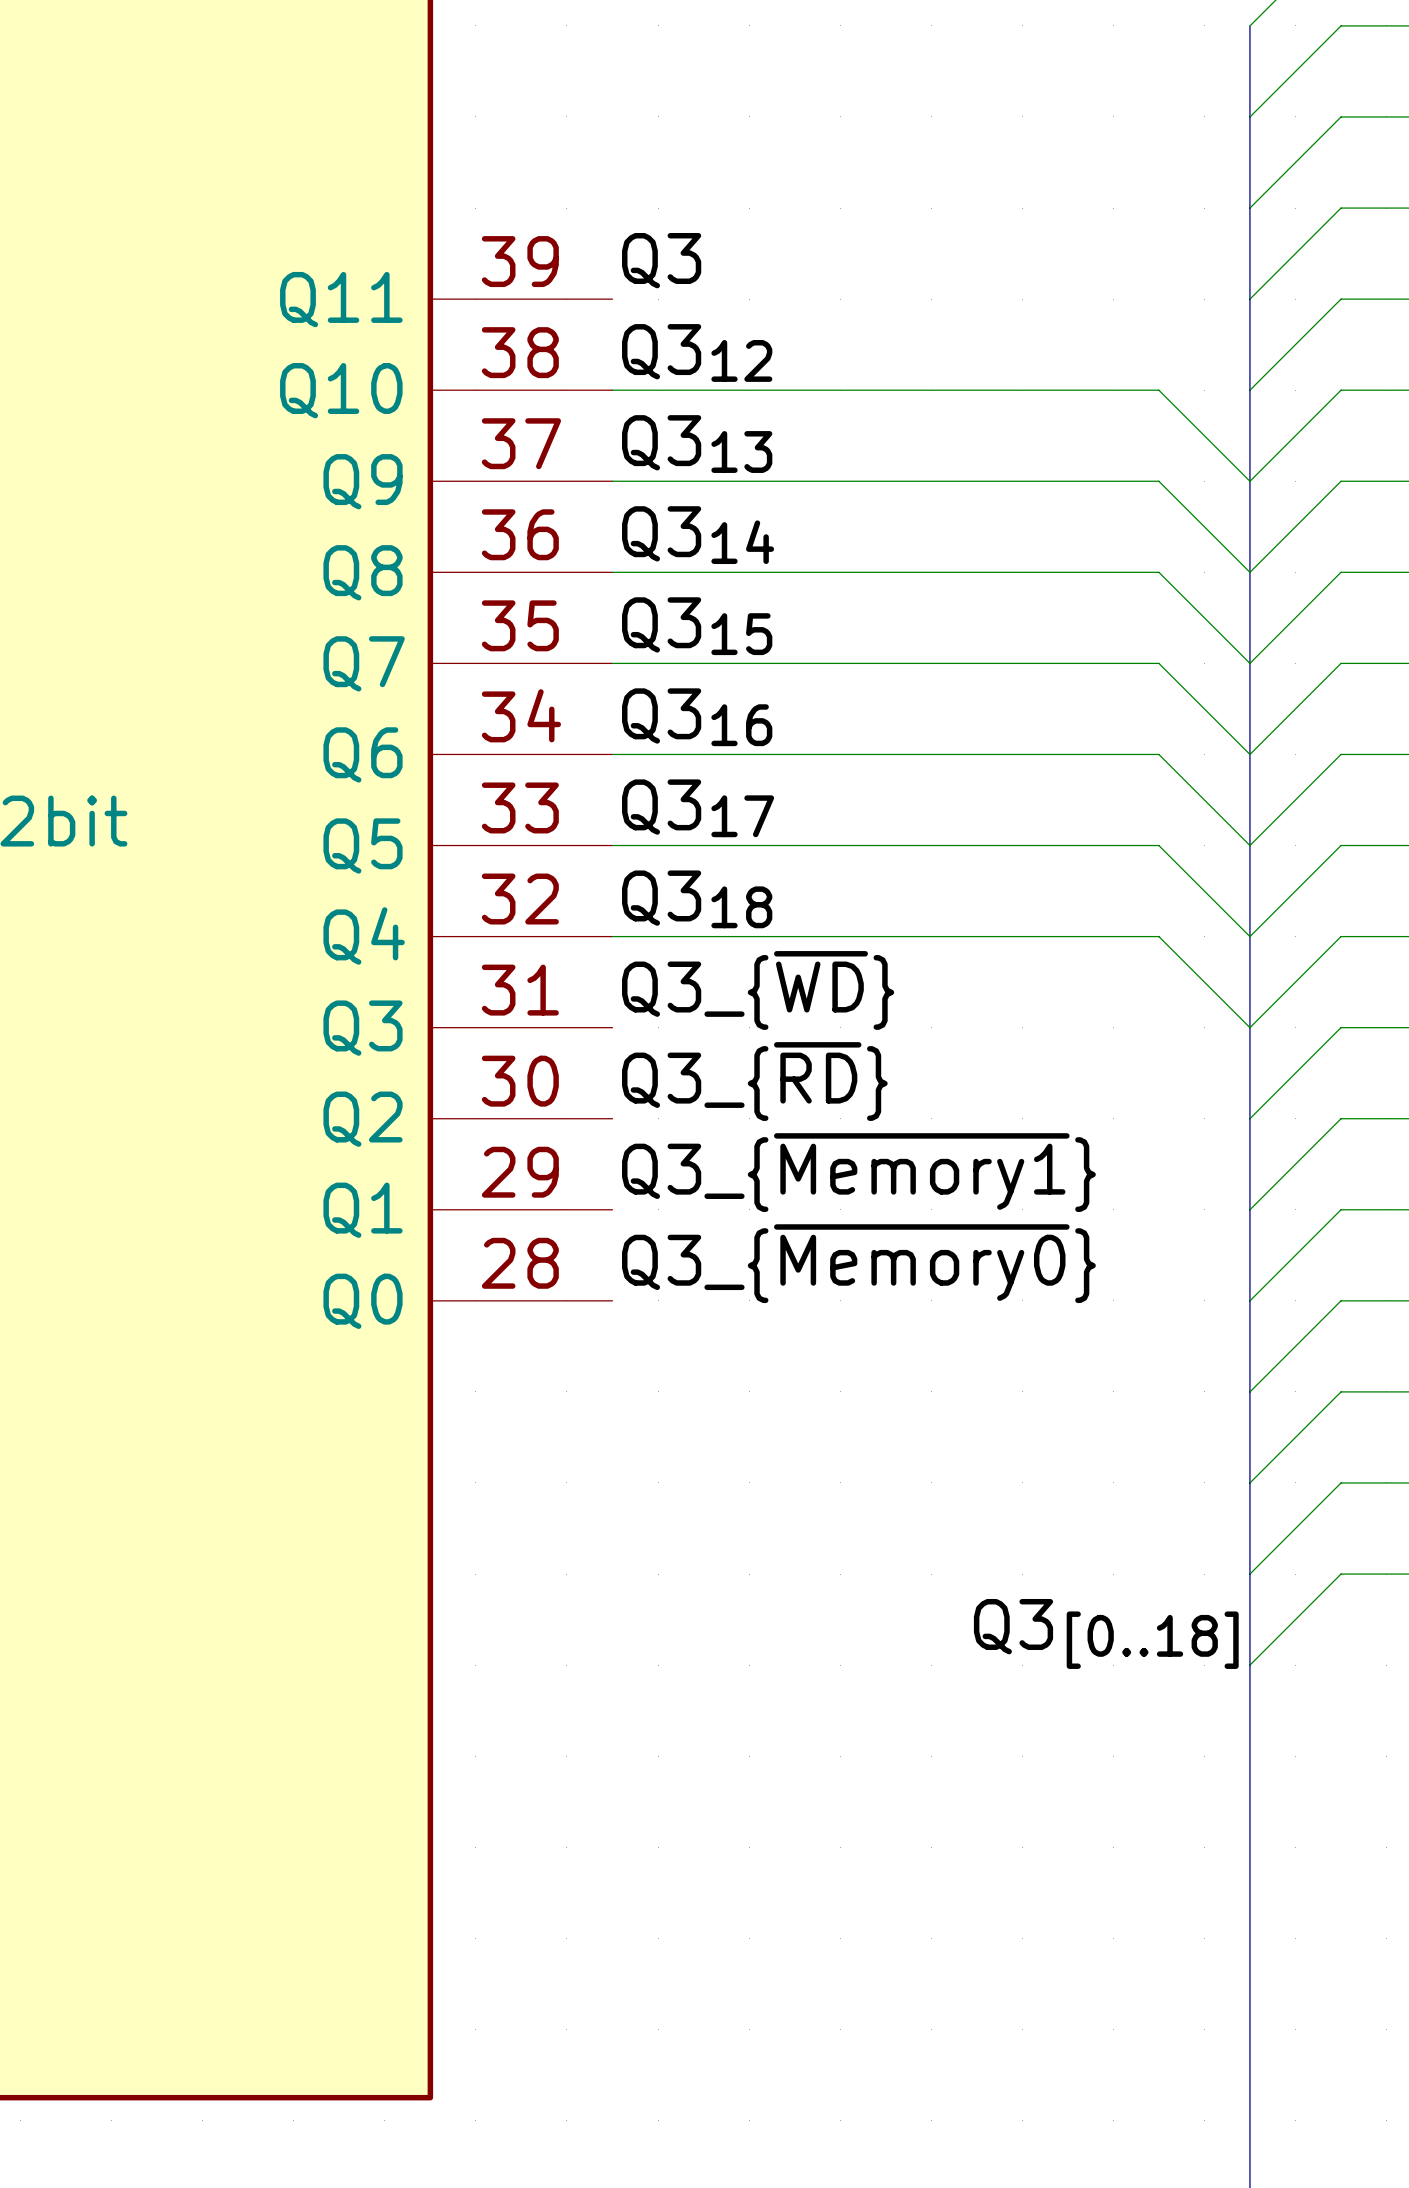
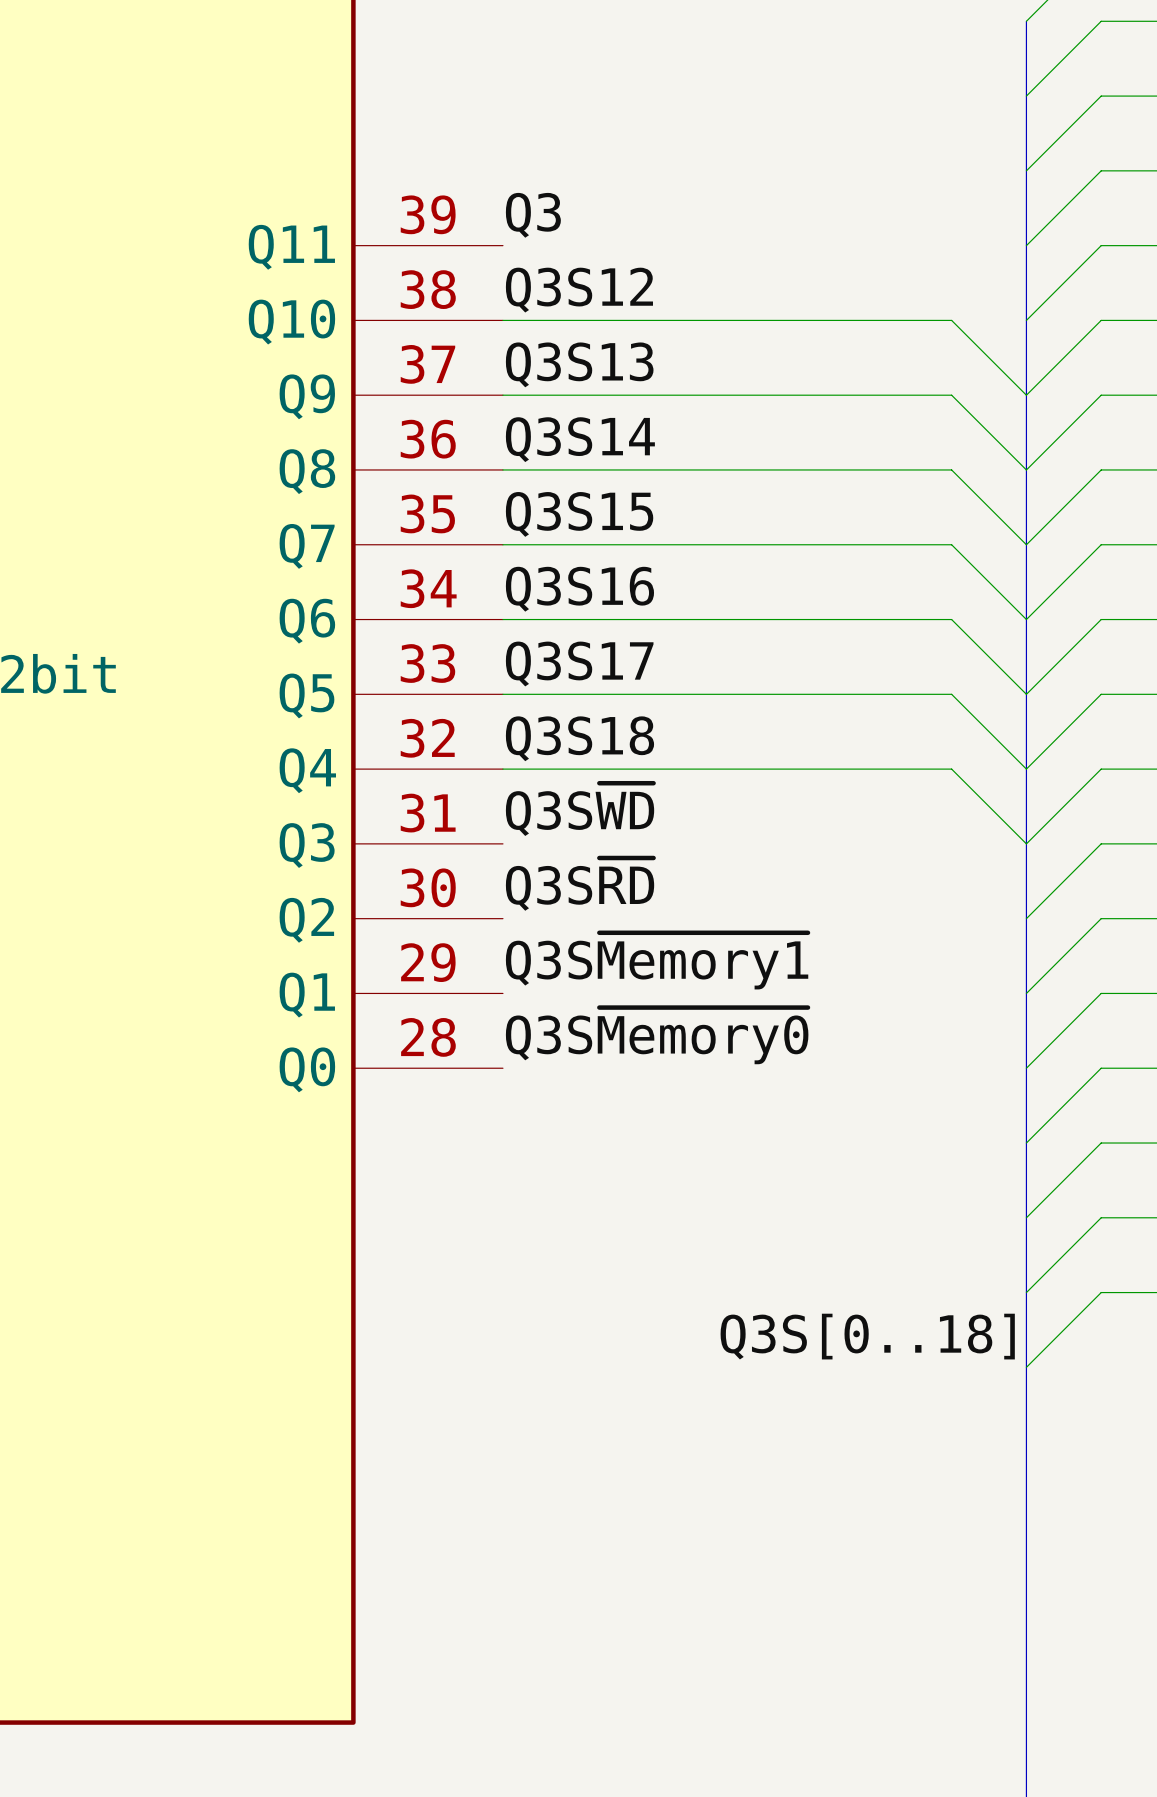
label: Q312 (697, 352) -> Q3S12 (579, 290)
label: Q313 (697, 444) -> Q3S13 (579, 364)
label: Q314 (698, 535) -> Q3S14 (580, 439)
label: Q315 (697, 626) -> Q3S15 (579, 514)
label: Q316 (697, 717) -> Q3S16 (579, 589)
label: Q317 (698, 808) -> Q3S17 (579, 664)
label: Q318 (697, 899) -> Q3S18 (579, 738)
label: Q3_{~{WD}} (758, 990) -> Q3S~{WD} (580, 809)
label: Q3_{~{RD}} (754, 1081) -> Q3S~{RD} (580, 884)
label: Q3_{~{Memory1}} (858, 1172) -> Q3S~{Memory1} (657, 961)
label: Q3_{~{Memory0}} (858, 1263) -> Q3S~{Memory0} (657, 1035)
label: Q3[0..18] (1106, 1633) -> Q3S[0..18] (867, 1336)

